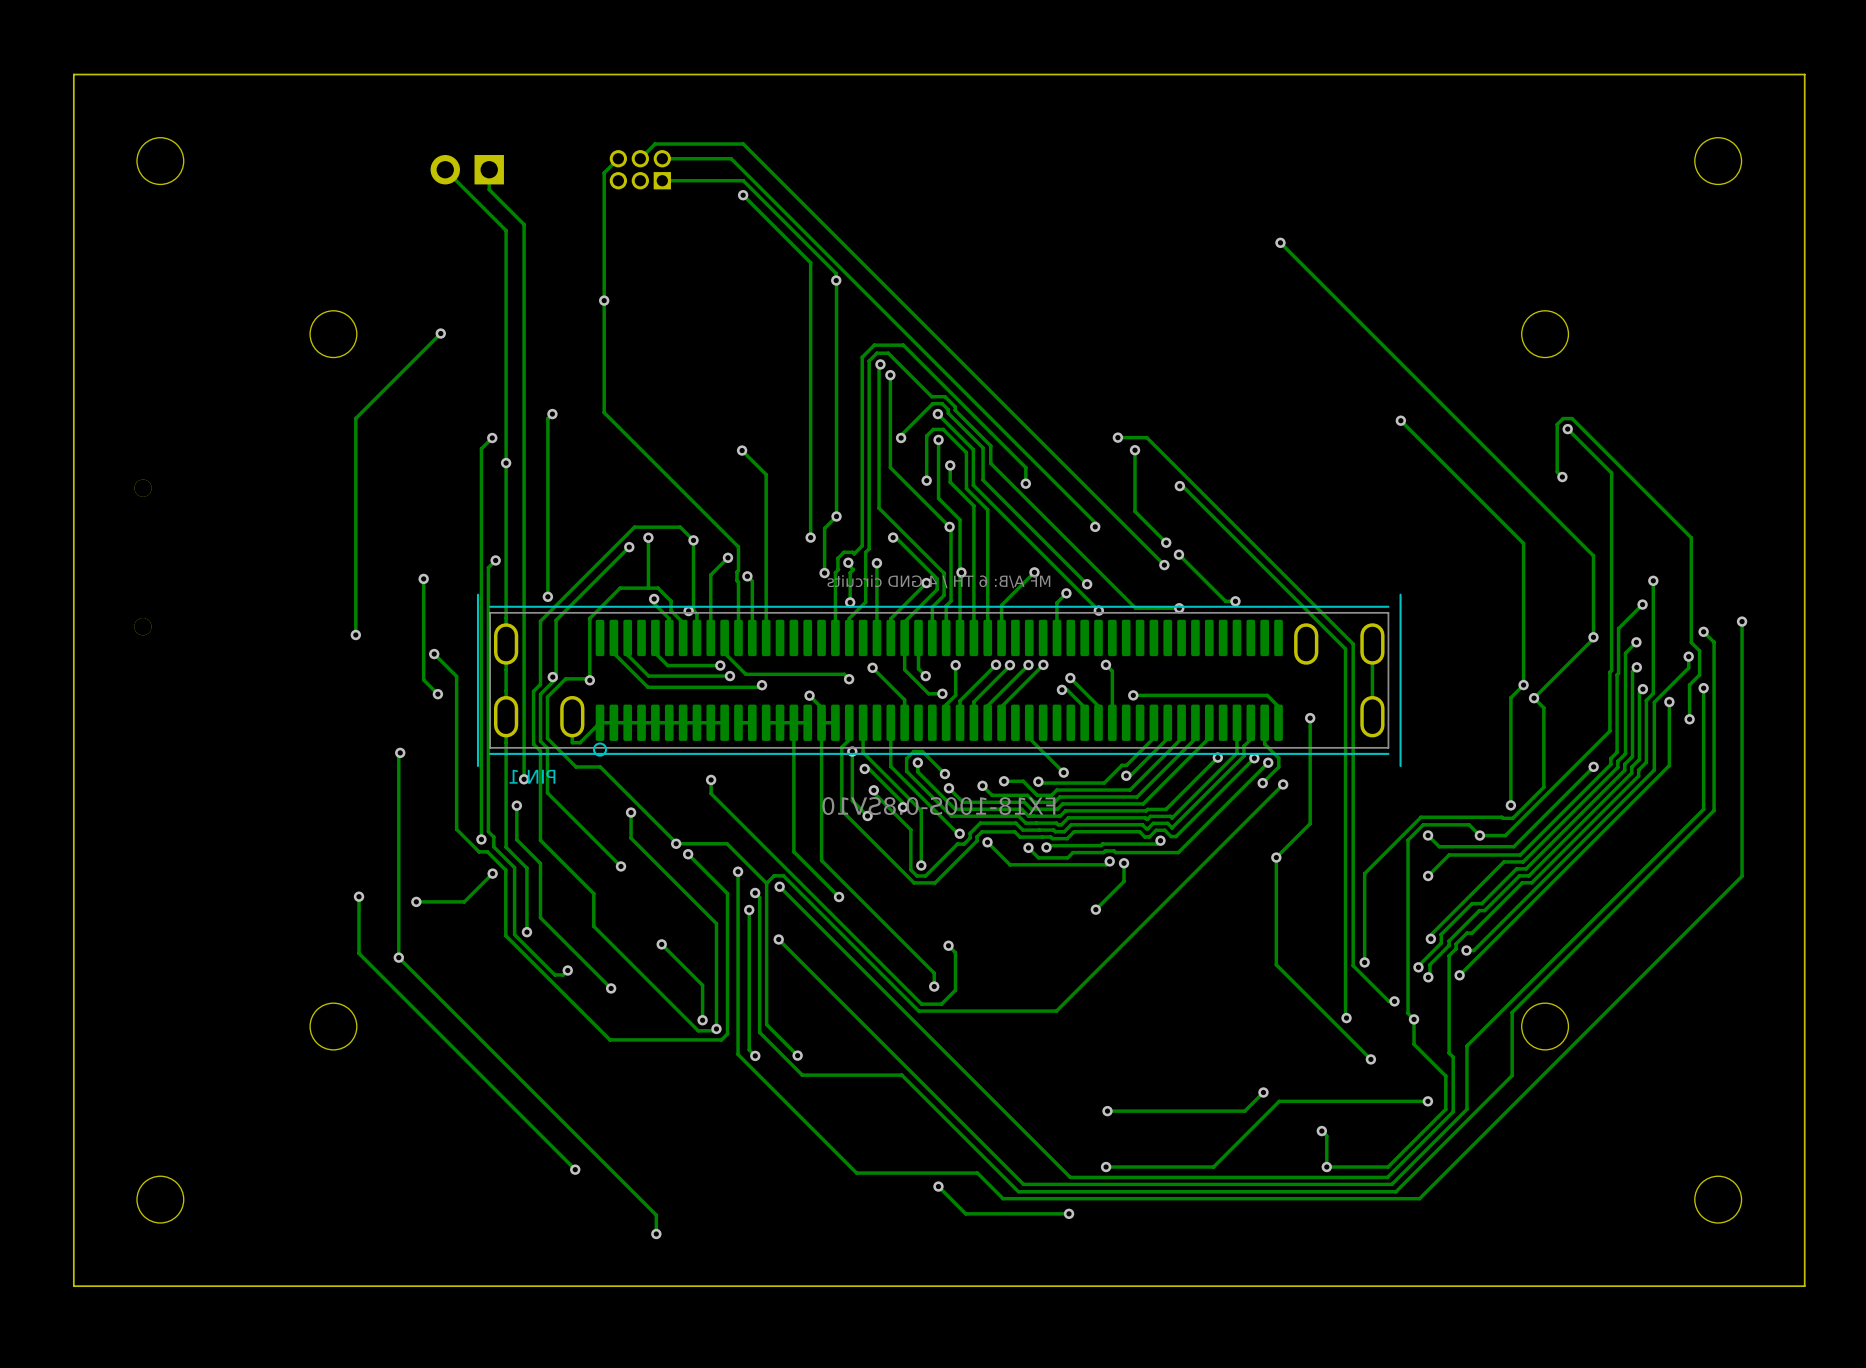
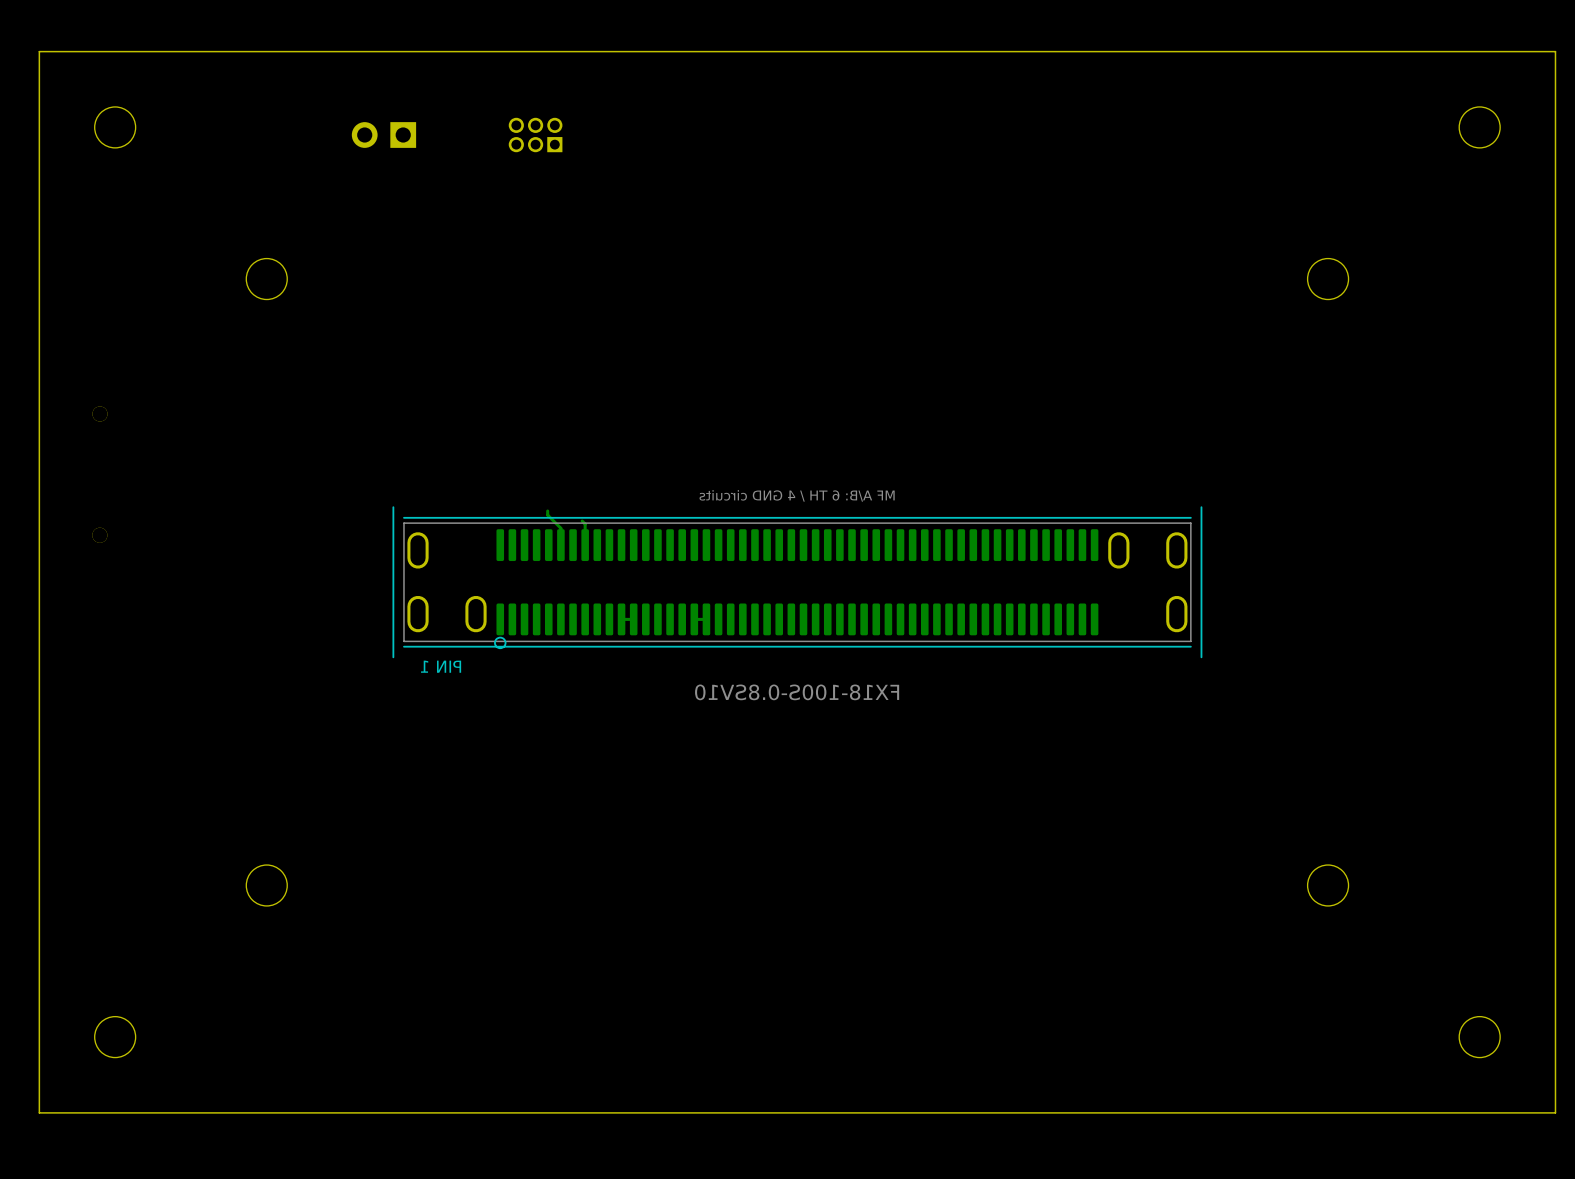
track: (618, 158) (604, 172) (604, 412) (738, 546) (738, 637) -> none
track: (640, 158) (655, 144) (743, 144) (1164, 565) -> none
track: (662, 158) (731, 158) (1095, 522) (1095, 526) -> none
track: (445, 169) (506, 230) (506, 847) (526, 868) (526, 932) -> none
track: (489, 169) (489, 189) (524, 224) (524, 779) -> none
track: (662, 180) (743, 180) (836, 273) (836, 516) (824, 528) (824, 573) -> none
track: (743, 195) (810, 262) (810, 537) -> none
via: (743, 195) -> none
track: (1280, 242) (1593, 555) (1593, 638) (1534, 698) (1543, 707) (1543, 787) (1512, 818) (1421, 817) (1364, 873) (1364, 962) -> none
via: (1280, 242) -> none
via: (836, 280) -> none
via: (604, 300) -> none
track: (440, 333) (355, 418) (355, 634) -> none
via: (440, 333) -> none
track: (880, 364) (879, 508) (944, 573) (944, 595) (932, 607) (932, 637) -> none
via: (880, 364) -> none
track: (890, 375) (890, 467) (951, 528) (951, 601) (946, 605) (946, 637) -> none
via: (890, 375) -> none
track: (552, 414) (547, 418) (547, 596) -> none
via: (552, 414) -> none
track: (937, 414) (973, 449) (973, 485) (1098, 610) -> none
via: (937, 414) -> none
track: (1400, 420) (1523, 543) (1523, 685) (1510, 697) (1510, 805) -> none
via: (1400, 420) -> none
track: (1567, 429) (1611, 472) (1609, 731) (1505, 835) (1479, 835) (1469, 824) (1423, 824) (1408, 840) (1408, 1013) (1414, 1019) (1414, 1044) (1445, 1076) (1445, 1109) (1388, 1167) (1326, 1167) (1326, 1135) (1321, 1131) -> none
via: (1567, 429) -> none
track: (1117, 437) (1146, 437) (1353, 643) (1353, 965) (1388, 1001) (1394, 1001) -> none
via: (1117, 437) -> none
track: (492, 438) (481, 448) (481, 839) -> none
via: (492, 438) -> none
track: (901, 438) (901, 435) (932, 403) (942, 403) (948, 409) (948, 413) (983, 447) (983, 480) (1087, 584) -> none
via: (901, 438) -> none
track: (938, 439) (938, 498) (960, 519) (960, 637) -> none
via: (938, 439) -> none
track: (742, 450) (766, 474) (766, 637) -> none
via: (742, 450) -> none
track: (1135, 450) (1135, 511) (1166, 542) -> none
via: (1135, 450) -> none
via: (506, 463) -> none
track: (950, 465) (950, 482) (973, 505) (973, 637) -> none
via: (950, 465) -> none
track: (1562, 477) (1557, 471) (1557, 424) (1563, 418) (1572, 418) (1691, 537) (1691, 642) (1699, 650) (1699, 674) (1689, 684) (1689, 719) -> none
via: (1562, 477) -> none
track: (926, 480) (926, 435) (933, 429) (943, 429) (966, 452) (966, 488) (987, 509) (987, 637) -> none
via: (926, 480) -> none
track: (1025, 483) (1025, 467) (903, 345) (874, 345) (862, 357) (862, 545) (854, 553) (844, 552) (837, 558) (838, 569) (835, 572) (835, 637) -> none
via: (1025, 483) -> none
track: (1179, 486) (1182, 486) (1345, 648) (1346, 1018) -> none
via: (1179, 486) -> none
via: (836, 516) -> none
via: (949, 526) -> none
via: (1095, 526) -> none
track: (648, 537) (648, 588) -> none
via: (648, 537) -> none
via: (810, 537) -> none
track: (893, 537) (895, 537) (937, 578) (937, 589) (904, 622) (904, 669) (928, 693) (942, 693) -> none
via: (893, 537) -> none
via: (693, 540) -> none
via: (1166, 542) -> none
track: (629, 547) (556, 620) (556, 678) -> none
via: (629, 547) -> none
track: (1178, 554) (1225, 601) (1235, 601) -> none
via: (1178, 554) -> none
track: (727, 557) (710, 574) (710, 637) -> none
via: (727, 557) -> none
track: (495, 560) (488, 567) (488, 831) (493, 837) (493, 846) (514, 867) (514, 934) (554, 974) (563, 974) (567, 970) -> none
via: (495, 560) -> none
track: (848, 562) (853, 569) (850, 572) (850, 602) -> none
via: (848, 562) -> none
track: (876, 563) (876, 637) -> none
via: (876, 563) -> none
via: (1164, 565) -> none
via: (961, 572) -> none
track: (1034, 572) (1001, 605) (1001, 637) -> none
via: (1034, 572) -> none
via: (824, 573) -> none
track: (747, 576) (752, 581) (752, 637) -> none
via: (747, 576) -> none
track: (423, 578) (423, 679) (437, 694) -> none
via: (423, 578) -> none
track: (1653, 580) (1653, 693) (1646, 700) (1646, 762) (1638, 770) (1638, 775) (1531, 882) (1522, 882) (1472, 933) (1466, 933) (1456, 944) (1456, 948) (1449, 955) (1449, 1053) (1453, 1057) (1453, 1111) (1387, 1177) (1070, 1177) (779, 886) -> none
via: (1653, 580) -> none
track: (926, 583) (890, 618) (890, 637) -> none
via: (926, 583) -> none
via: (1087, 584) -> none
track: (1066, 593) (1056, 602) (1056, 637) -> none
via: (1066, 593) -> none
via: (547, 596) -> none
via: (654, 598) -> none
via: (1235, 601) -> none
via: (850, 602) -> none
track: (1642, 604) (1618, 628) (1617, 752) (1610, 758) (1610, 764) (1520, 854) (1449, 854) (1428, 875) -> none
via: (1642, 604) -> none
track: (1179, 608) (1135, 608) (990, 463) (990, 445) (955, 410) (955, 406) (945, 396) (931, 396) (888, 353) (876, 353) (869, 361) (869, 548) (865, 552) (865, 602) (849, 618) (849, 637) -> none
via: (1179, 608) -> none
via: (1098, 610) -> none
track: (688, 611) (693, 610) (693, 540) (680, 527) (634, 527) (540, 621) (540, 684) (533, 691) (533, 744) (540, 751) (540, 840) (593, 893) (593, 926) (698, 1030) (714, 1030) (716, 1028) (716, 923) (631, 838) (631, 812) -> none
via: (688, 611) -> none
track: (1742, 621) (1742, 876) (1419, 1198) (1003, 1198) (977, 1173) (856, 1173) (738, 1054) (738, 871) -> none
via: (1742, 621) -> none
track: (1703, 631) (1714, 642) (1714, 810) (1512, 1012) (1512, 1075) (1396, 1191) (1018, 1191) (901, 1075) (802, 1075) (759, 1032) (759, 897) (755, 892) -> none
via: (1703, 631) -> none
via: (355, 634) -> none
track: (613, 637) (613, 653) (647, 687) (759, 687) (762, 685) -> none
track: (627, 637) (627, 655) (648, 676) (729, 676) -> none
track: (655, 637) (655, 653) (667, 665) (720, 665) -> none
track: (683, 637) (683, 622) (671, 610) (671, 601) (658, 588) (620, 588) (589, 618) (589, 680) -> none
track: (724, 637) (724, 653) (745, 674) (844, 674) (849, 679) -> none
track: (918, 637) (918, 668) (925, 676) -> none
via: (1593, 637) -> none
track: (1636, 642) (1625, 653) (1625, 753) (1617, 761) (1617, 767) (1523, 861) (1503, 861) (1430, 934) (1430, 938) -> none
via: (1636, 642) -> none
track: (1372, 643) (1372, 716) -> none
track: (434, 654) (456, 676) (456, 829) (479, 851) (487, 851) (505, 870) (505, 935) (609, 1039) (721, 1039) (727, 1033) (727, 893) (688, 854) -> none
via: (434, 654) -> none
track: (1688, 656) (1688, 667) (1654, 702) (1654, 770) (1473, 950) (1466, 950) -> none
via: (1688, 656) -> none
track: (996, 664) (960, 700) (960, 722) -> none
via: (996, 664) -> none
track: (1043, 664) (1001, 706) (1001, 722) -> none
via: (1043, 664) -> none
track: (1105, 664) (1112, 671) (1112, 722) -> none
via: (1105, 664) -> none
via: (720, 665) -> none
track: (955, 665) (955, 695) (946, 704) (946, 722) -> none
via: (955, 665) -> none
track: (1009, 665) (973, 701) (973, 722) -> none
via: (1009, 665) -> none
track: (1028, 665) (987, 705) (987, 722) -> none
via: (1028, 665) -> none
track: (872, 667) (904, 699) (904, 722) -> none
via: (872, 667) -> none
track: (1636, 667) (1632, 671) (1632, 756) (1624, 764) (1624, 770) (1526, 868) (1516, 868) (1481, 903) (1472, 903) (1441, 934) (1441, 943) (1418, 967) -> none
via: (1636, 667) -> none
via: (729, 676) -> none
via: (925, 676) -> none
track: (552, 677) (555, 678) (540, 694) (540, 741) (547, 748) (547, 792) (620, 866) -> none
via: (552, 677) -> none
track: (589, 678) (565, 678) (547, 697) (547, 738) (576, 766) (600, 766) (676, 843) (727, 843) (766, 883) -> none
track: (1070, 678) (1098, 706) (1098, 722) -> none
via: (1070, 678) -> none
via: (849, 679) -> none
via: (589, 680) -> none
via: (762, 685) -> none
via: (1523, 685) -> none
track: (1703, 688) (1703, 809) (1466, 1046) (1466, 1109) (1391, 1184) (1023, 1184) (778, 939) -> none
via: (1703, 688) -> none
track: (1061, 689) (1067, 689) (1084, 707) (1084, 722) -> none
via: (1061, 689) -> none
track: (1642, 689) (1639, 692) (1639, 759) (1631, 767) (1631, 773) (1528, 875) (1519, 875) (1484, 910) (1479, 910) (1449, 940) (1449, 945) (1429, 964) (1428, 977) -> none
via: (1642, 689) -> none
via: (942, 693) -> none
via: (437, 694) -> none
track: (809, 695) (821, 707) (821, 860) (934, 973) (934, 986) -> none
via: (809, 695) -> none
track: (1133, 695) (1267, 695) (1278, 706) (1278, 722) -> none
via: (1133, 695) -> none
via: (1534, 698) -> none
track: (1669, 701) (1669, 765) (1459, 975) -> none
via: (1669, 701) -> none
track: (572, 716) (572, 742) (580, 742) (600, 722) (724, 722) -> none
track: (1310, 718) (1310, 823) (1276, 857) (1276, 964) (1370, 1059) -> none
via: (1310, 718) -> none
via: (1689, 719) -> none
track: (793, 722) (793, 851) (839, 896) -> none
track: (807, 722) (766, 722) -> none
track: (849, 722) (849, 739) (841, 747) (841, 810) (914, 882) (935, 882) (977, 840) (977, 836) (981, 831) (1014, 831) (1019, 837) (1067, 838) (1074, 831) (1139, 831) (1144, 836) (1149, 836) (1156, 830) (1164, 830) (1171, 836) (1176, 836) (1254, 758) -> none
track: (863, 722) (863, 752) (921, 810) (921, 865) -> none
track: (890, 722) (890, 766) (959, 833) -> none
track: (1029, 722) (1029, 738) (1063, 772) -> none
track: (1153, 722) (1153, 738) (1126, 765) (1121, 765) (1104, 783) (1038, 781) -> none
track: (1167, 722) (1167, 738) (1130, 775) (1126, 775) -> none
track: (1181, 722) (1181, 738) (1130, 790) (1056, 790) (1051, 795) (1037, 795) (1023, 781) (1004, 781) -> none
track: (1195, 722) (1195, 738) (1137, 796) (1059, 796) (1054, 802) (1034, 802) (1027, 795) (992, 795) (982, 785) -> none
track: (1209, 722) (1209, 737) (1143, 803) (1062, 803) (1057, 809) (1031, 809) (1024, 802) (963, 802) (948, 788) -> none
track: (1236, 722) (1236, 753) (1172, 817) (1170, 816) (1150, 816) (1147, 818) (1068, 817) (1061, 824) (1058, 824) (1056, 823) (1025, 823) (1018, 816) (951, 816) (906, 771) (906, 758) (913, 751) (922, 751) (944, 774) -> none
track: (1250, 722) (1250, 739) (1243, 746) (1243, 756) (1172, 827) (1167, 823) (1153, 823) (1147, 828) (1142, 824) (1071, 824) (1064, 831) (1055, 831) (1053, 830) (1022, 830) (1015, 823) (980, 823) (970, 833) (970, 838) (964, 844) (957, 844) (925, 875) (916, 875) (910, 869) (910, 829) (873, 792) (873, 790) -> none
track: (1264, 722) (1264, 744) (1278, 758) (1278, 767) (1262, 783) -> none
track: (852, 751) (852, 800) (867, 815) -> none
via: (852, 751) -> none
track: (400, 752) (398, 957) (656, 1215) (656, 1233) -> none
via: (400, 752) -> none
track: (1217, 757) (1165, 809) (1065, 810) (1059, 816) -> none
via: (1217, 757) -> none
via: (1254, 758) -> none
track: (917, 762) (917, 771) (955, 809) (1021, 809) (1028, 816) (1059, 816) -> none
via: (917, 762) -> none
track: (1268, 762) (1178, 852) (1105, 850) (1103, 852) (1072, 852) (1067, 857) (1038, 857) (1028, 847) -> none
via: (1268, 762) -> none
track: (1593, 766) (1513, 846) (1439, 846) (1428, 835) -> none
via: (1593, 766) -> none
track: (864, 768) (869, 768) (903, 802) (903, 807) -> none
via: (864, 768) -> none
via: (1063, 772) -> none
via: (944, 774) -> none
via: (1126, 775) -> none
via: (524, 779) -> none
track: (711, 779) (711, 793) (921, 1004) (941, 1004) (955, 990) (955, 952) (948, 945) -> none
via: (711, 779) -> none
via: (1004, 781) -> none
via: (1038, 781) -> none
via: (1262, 783) -> none
track: (1283, 784) (1056, 1011) (918, 1011) (783, 875) (774, 875) (766, 883) -> none
via: (1283, 784) -> none
via: (982, 785) -> none
via: (948, 788) -> none
via: (873, 790) -> none
track: (516, 805) (516, 839) (540, 863) (540, 917) (611, 988) -> none
via: (516, 805) -> none
via: (1510, 805) -> none
via: (903, 807) -> none
via: (631, 812) -> none
via: (867, 815) -> none
via: (959, 833) -> none
via: (1428, 835) -> none
via: (1479, 835) -> none
via: (481, 839) -> none
track: (1160, 840) (1157, 844) (1048, 845) (1046, 847) -> none
via: (1160, 840) -> none
track: (987, 842) (1010, 864) (1106, 864) (1109, 861) -> none
via: (987, 842) -> none
via: (676, 843) -> none
via: (1028, 847) -> none
via: (1046, 847) -> none
via: (688, 854) -> none
via: (1276, 857) -> none
via: (1109, 861) -> none
track: (1124, 863) (1124, 881) (1095, 909) -> none
via: (1124, 863) -> none
via: (921, 865) -> none
via: (620, 866) -> none
via: (738, 871) -> none
track: (492, 873) (464, 901) (416, 901) -> none
via: (492, 873) -> none
via: (1428, 875) -> none
track: (766, 883) (766, 1024) (797, 1055) -> none
via: (779, 886) -> none
via: (755, 892) -> none
track: (359, 896) (359, 953) (575, 1169) -> none
via: (359, 896) -> none
via: (839, 896) -> none
via: (416, 901) -> none
via: (1095, 909) -> none
track: (749, 910) (749, 1049) (755, 1055) -> none
via: (749, 910) -> none
via: (526, 932) -> none
via: (1430, 938) -> none
via: (778, 939) -> none
track: (661, 944) (702, 985) (702, 1020) -> none
via: (661, 944) -> none
via: (948, 945) -> none
via: (1466, 950) -> none
via: (398, 957) -> none
via: (1364, 962) -> none
via: (1418, 967) -> none
via: (567, 970) -> none
via: (1459, 975) -> none
via: (1428, 977) -> none
via: (934, 986) -> none
via: (611, 988) -> none
via: (1394, 1001) -> none
via: (1346, 1018) -> none
via: (1414, 1019) -> none
via: (702, 1020) -> none
via: (716, 1028) -> none
via: (755, 1055) -> none
via: (797, 1055) -> none
via: (1370, 1059) -> none
track: (1263, 1092) (1244, 1111) (1107, 1111) -> none
via: (1263, 1092) -> none
track: (1427, 1101) (1279, 1101) (1213, 1167) (1106, 1167) -> none
via: (1427, 1101) -> none
via: (1107, 1111) -> none
via: (1321, 1131) -> none
via: (1106, 1167) -> none
via: (1326, 1167) -> none
via: (575, 1169) -> none
track: (938, 1186) (965, 1213) (1069, 1213) -> none
via: (938, 1186) -> none
via: (1069, 1213) -> none
via: (656, 1233) -> none

